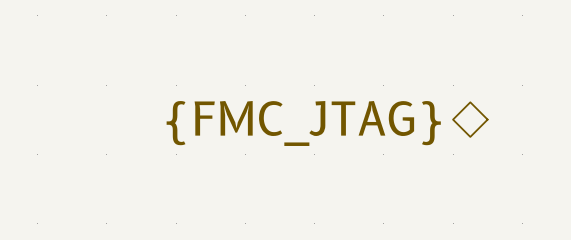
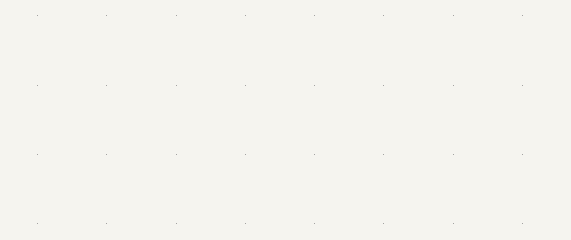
hierarchical label: {FMC_JTAG} (303, 123) -> none

